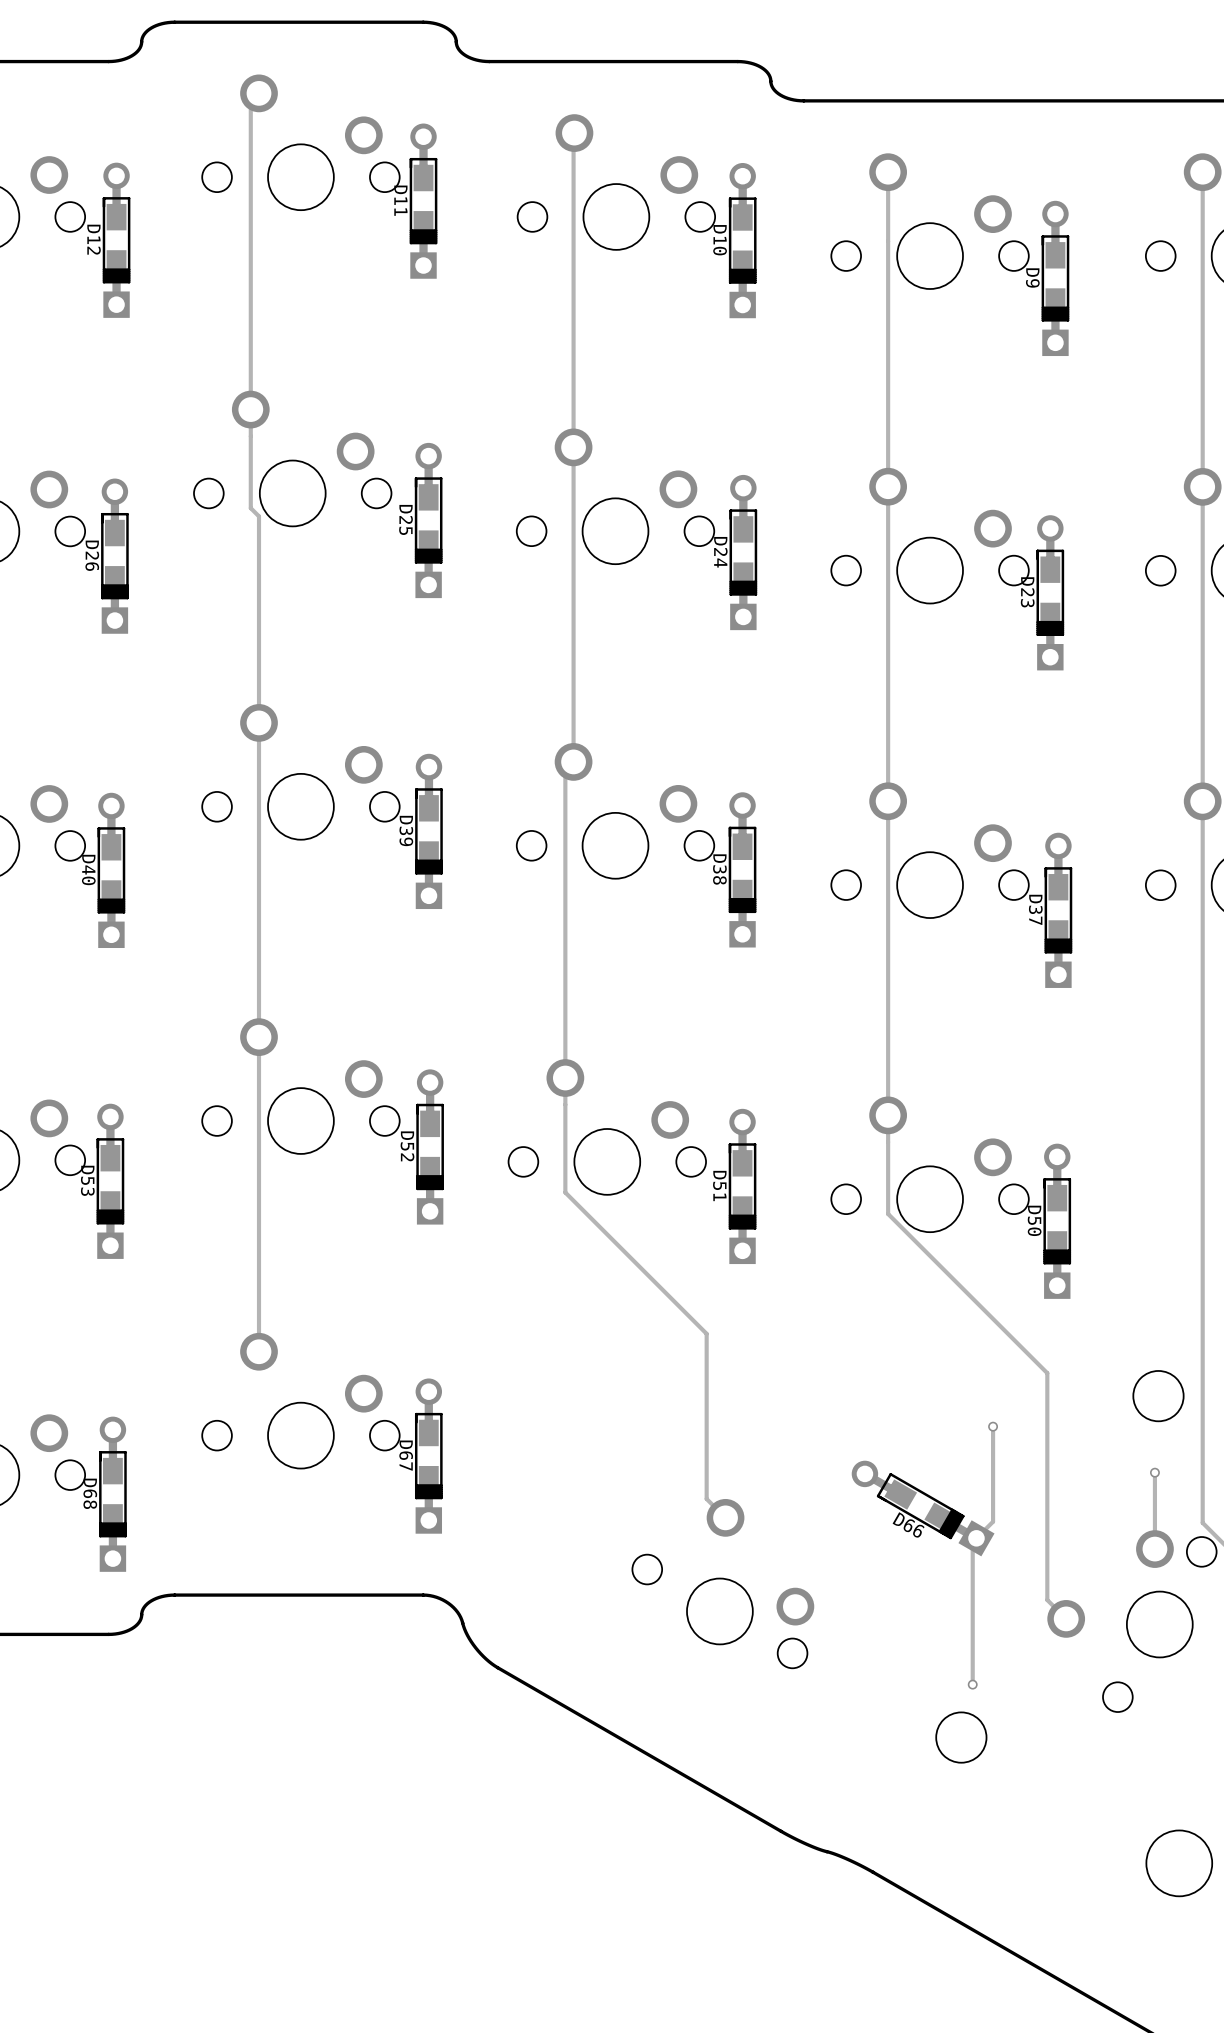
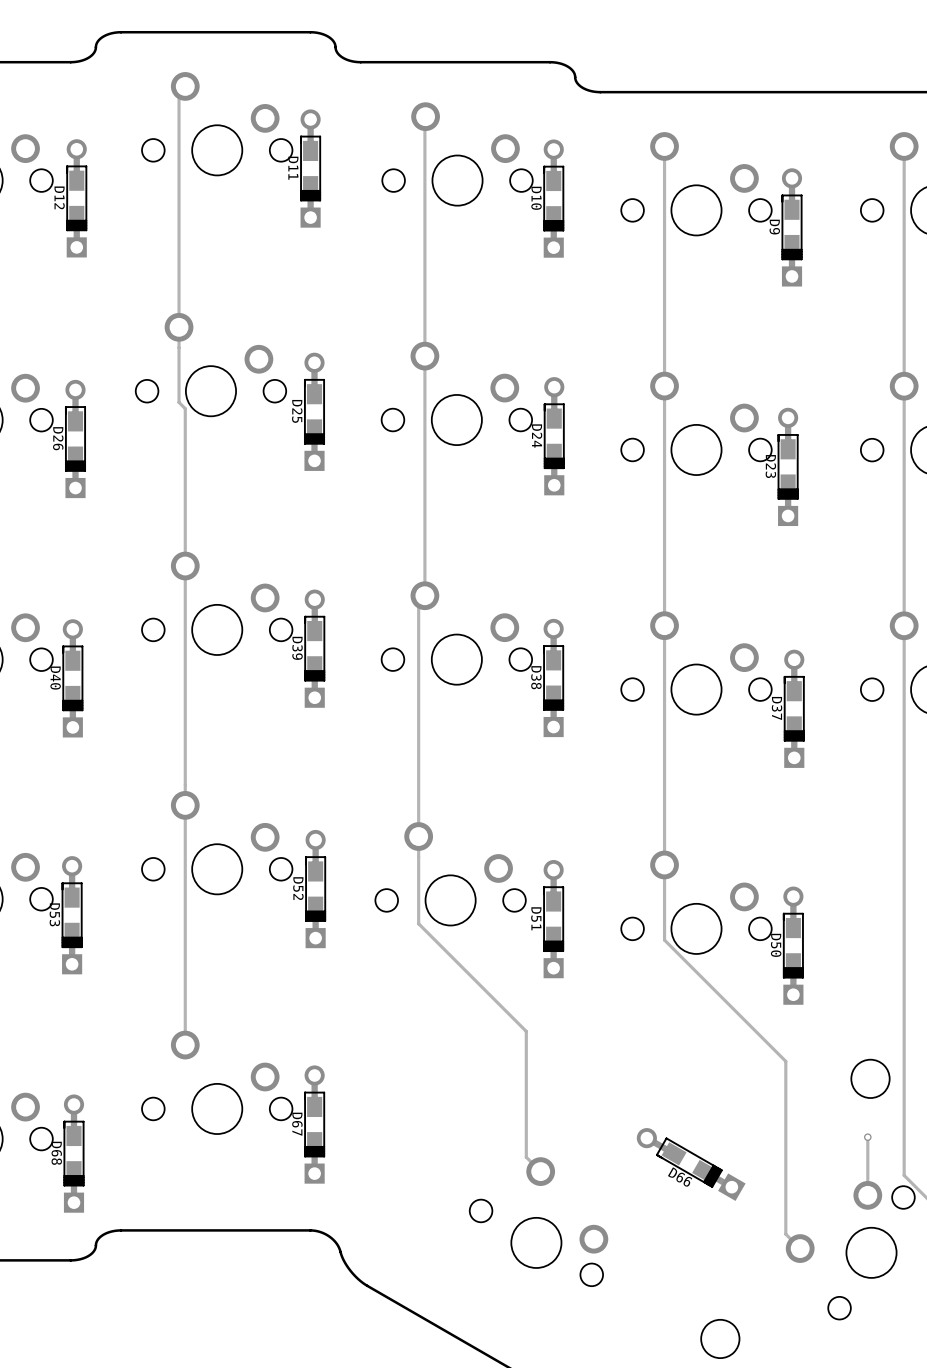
track: (993, 1426) (993, 1521) (972, 1542) (972, 1684) -> none
via: (993, 1426) -> none
via: (972, 1684) -> none

